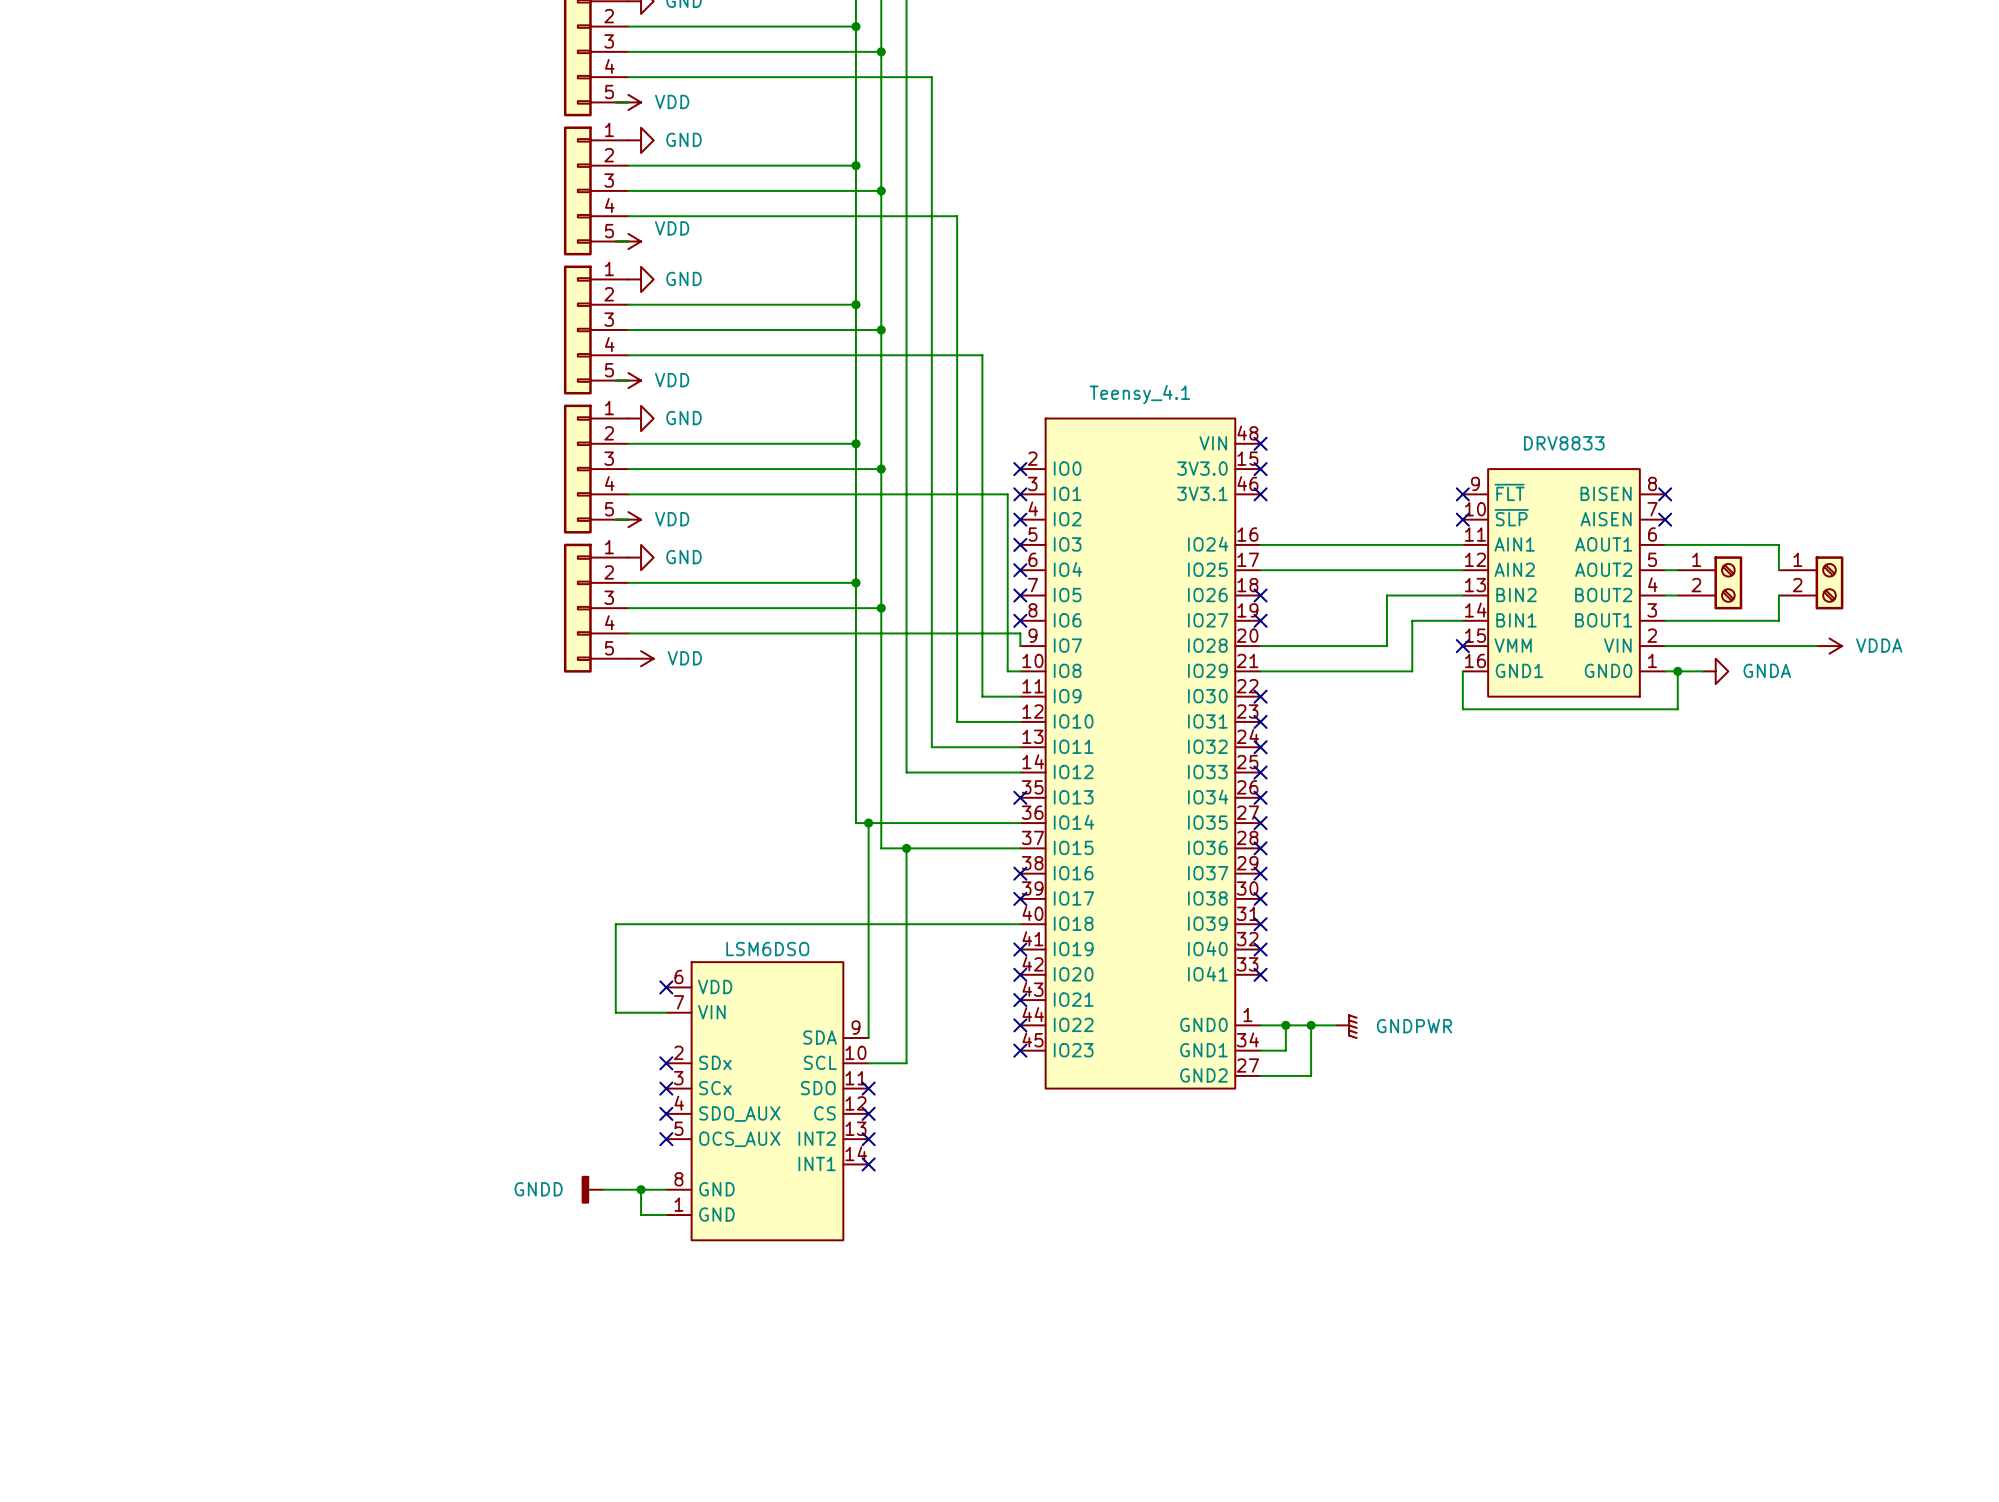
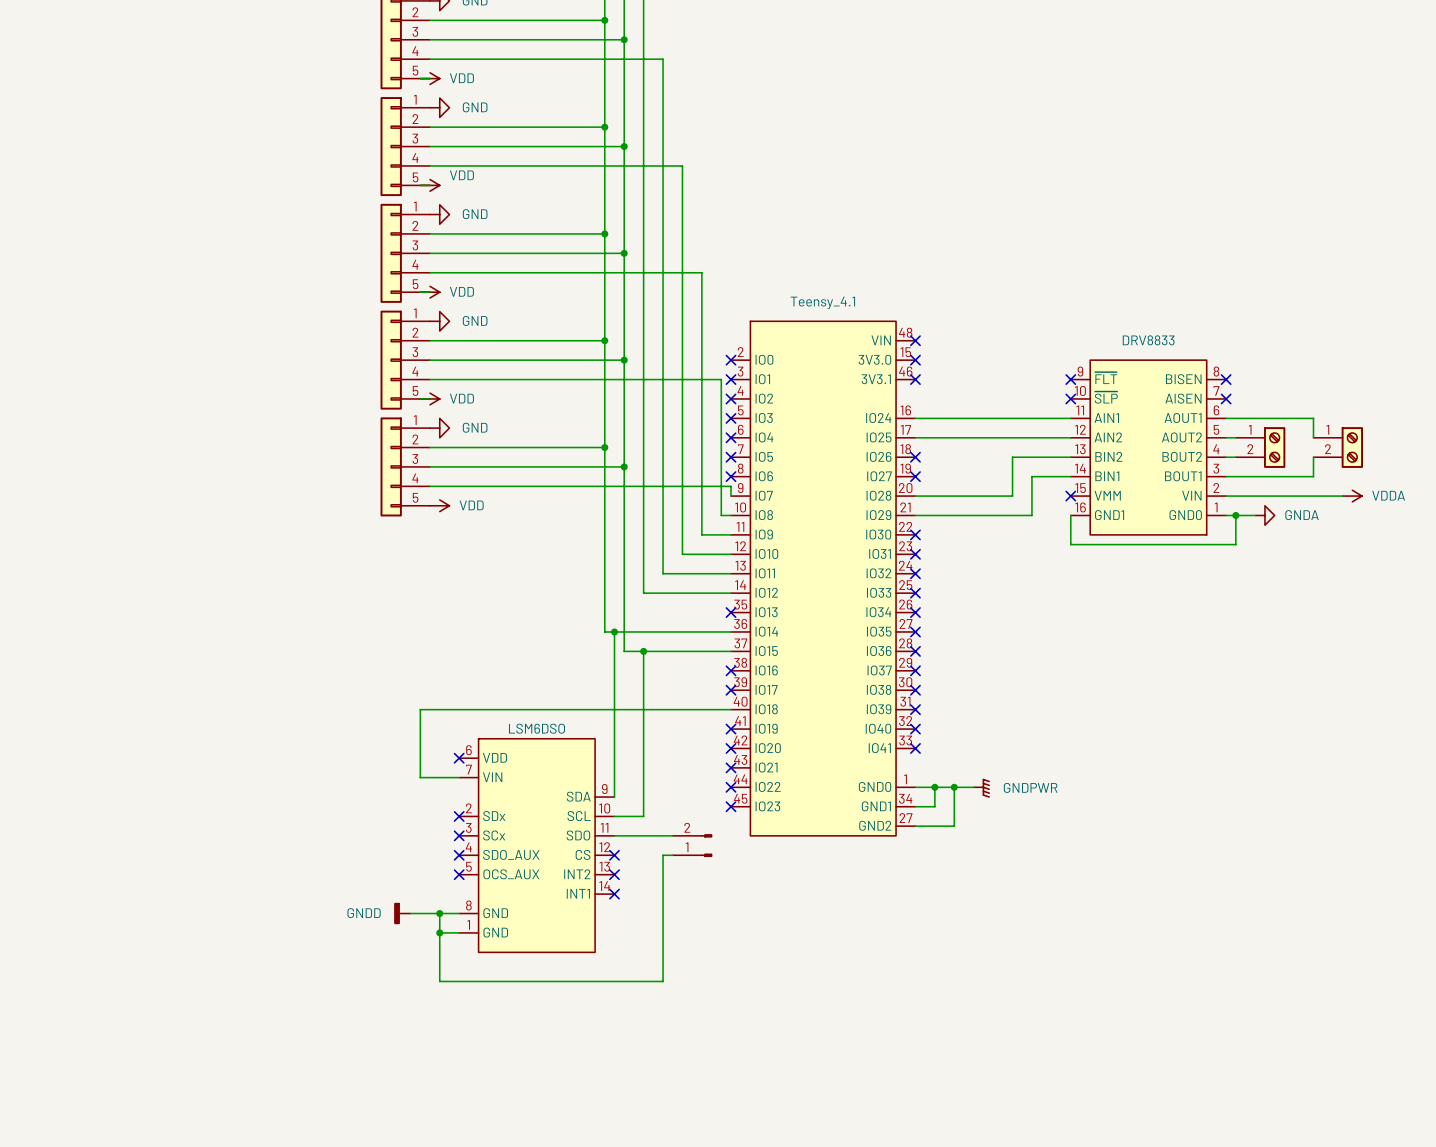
wire: none -> (614, 835) (672, 835)
no-connect mark: (868, 1088) -> none
part: none -> (692, 845)
wire: none -> (672, 855) (663, 855) (663, 981) (439, 981) (439, 932)
junction: none -> (439, 932)

